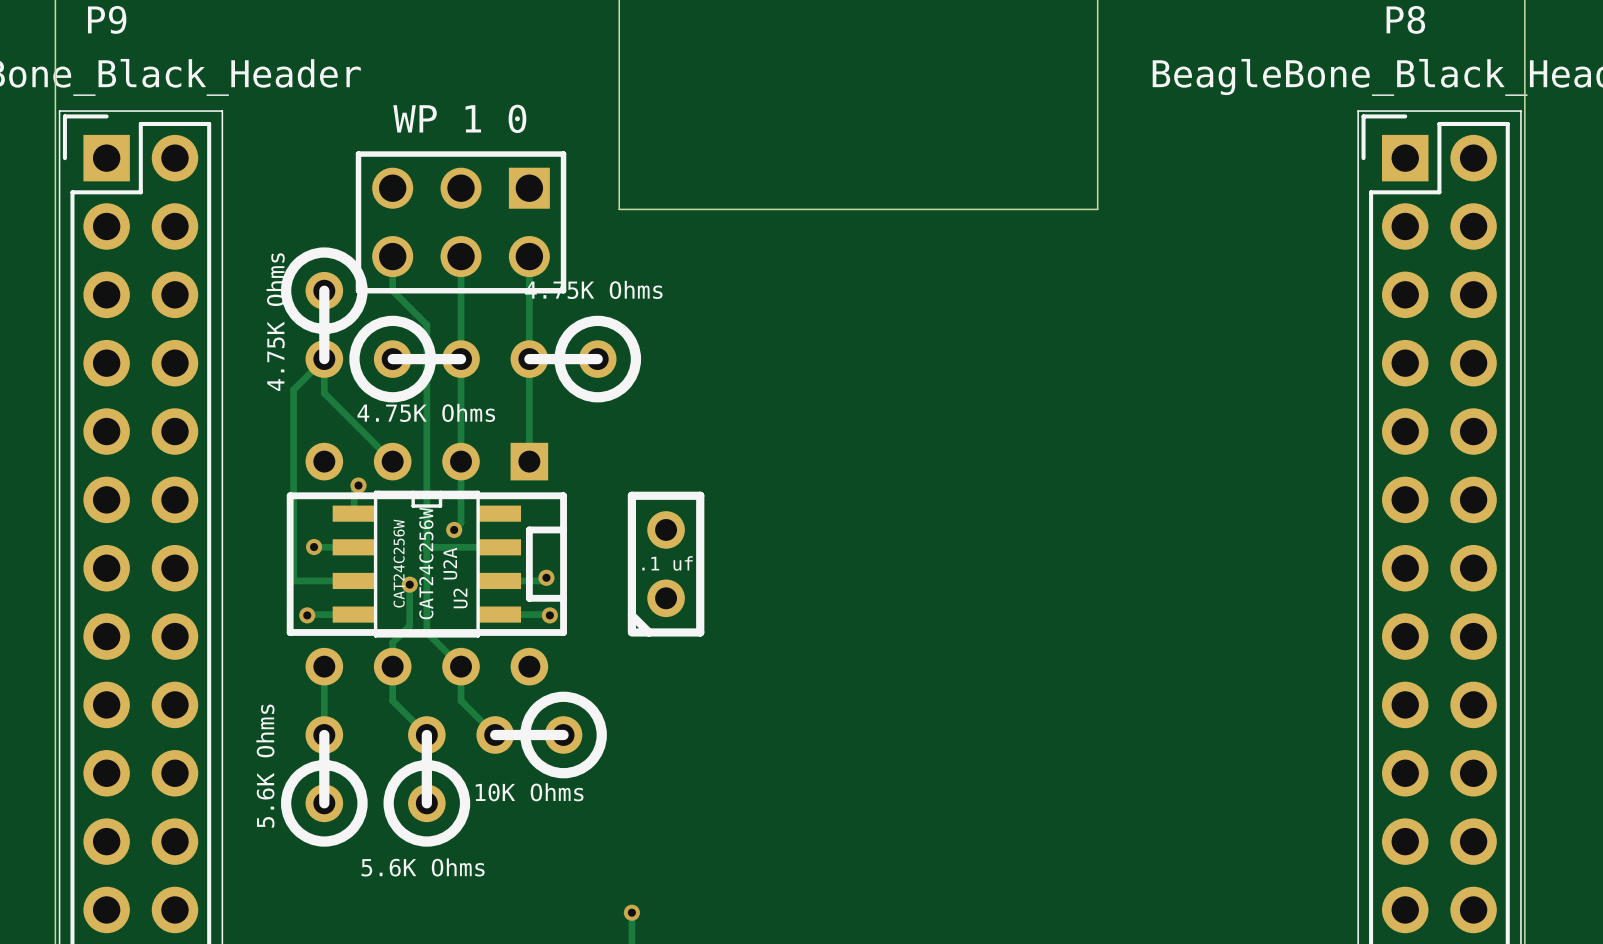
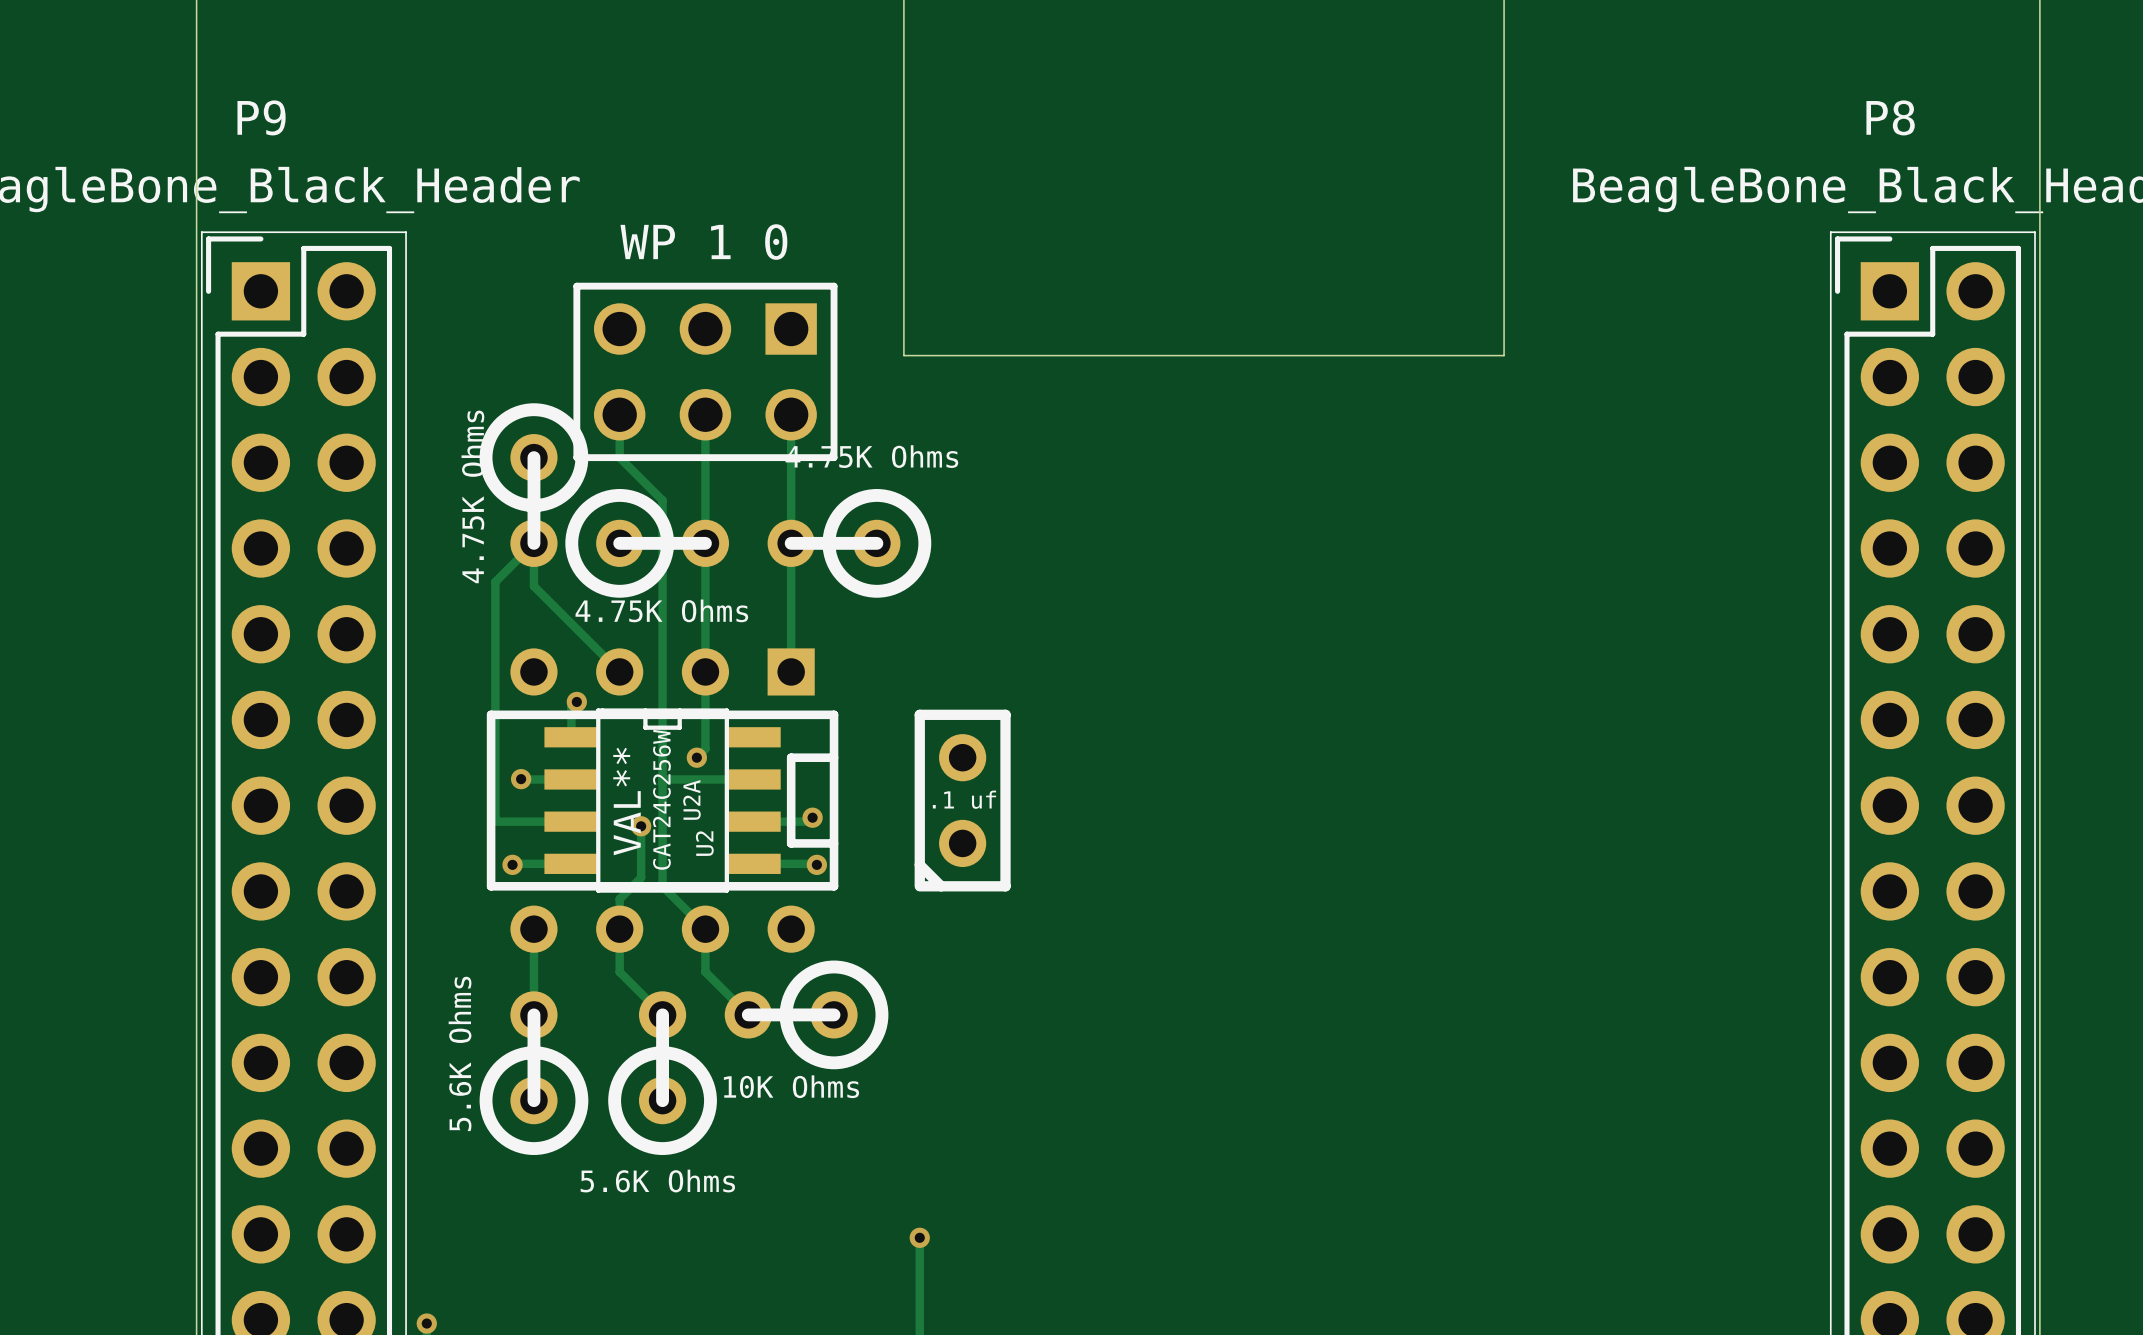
U2A value: CAT24C256W (399, 563) -> VAL** (627, 801)

